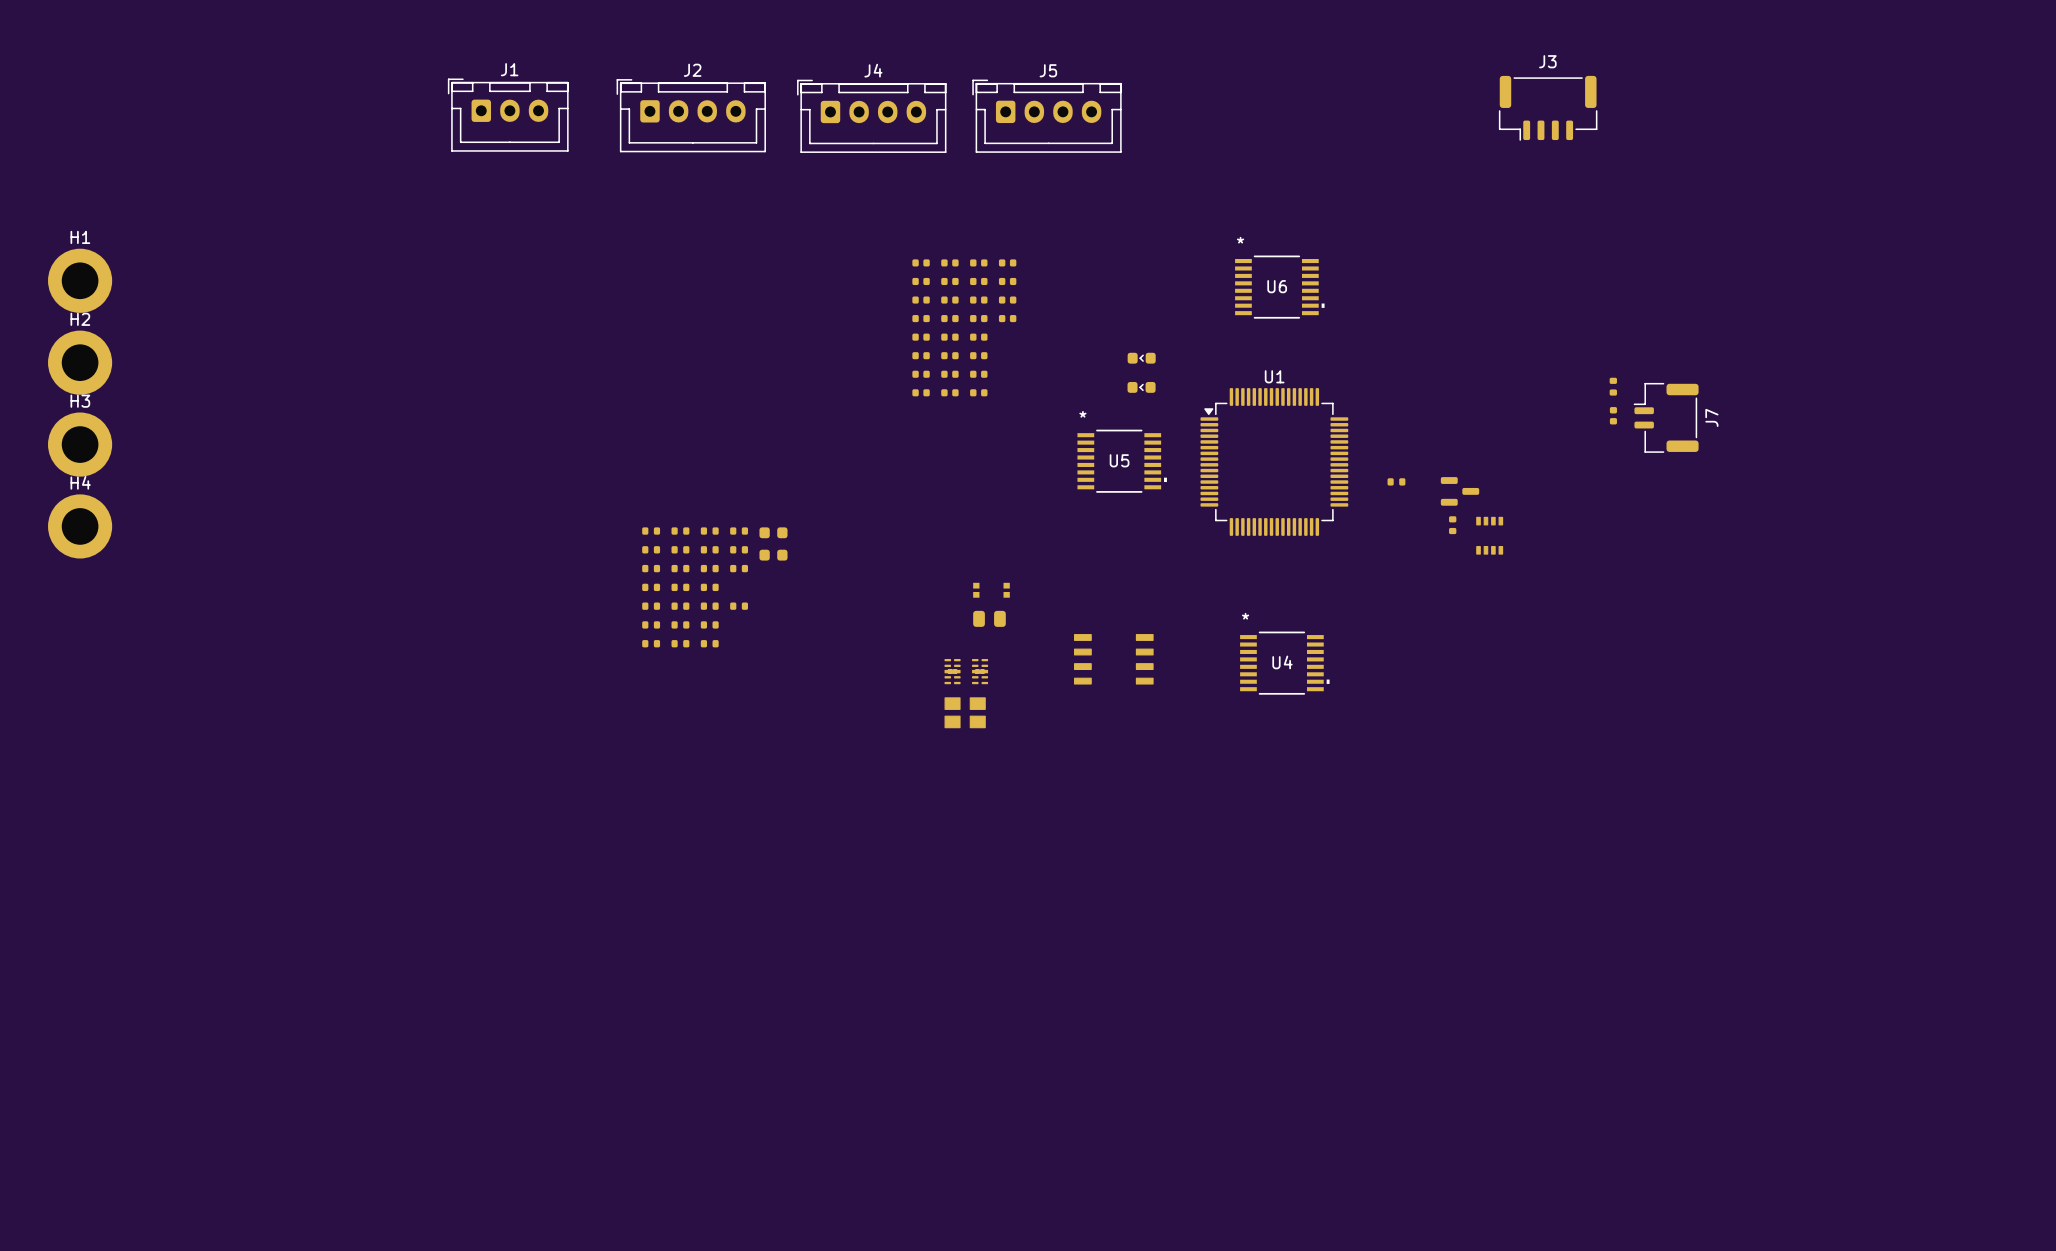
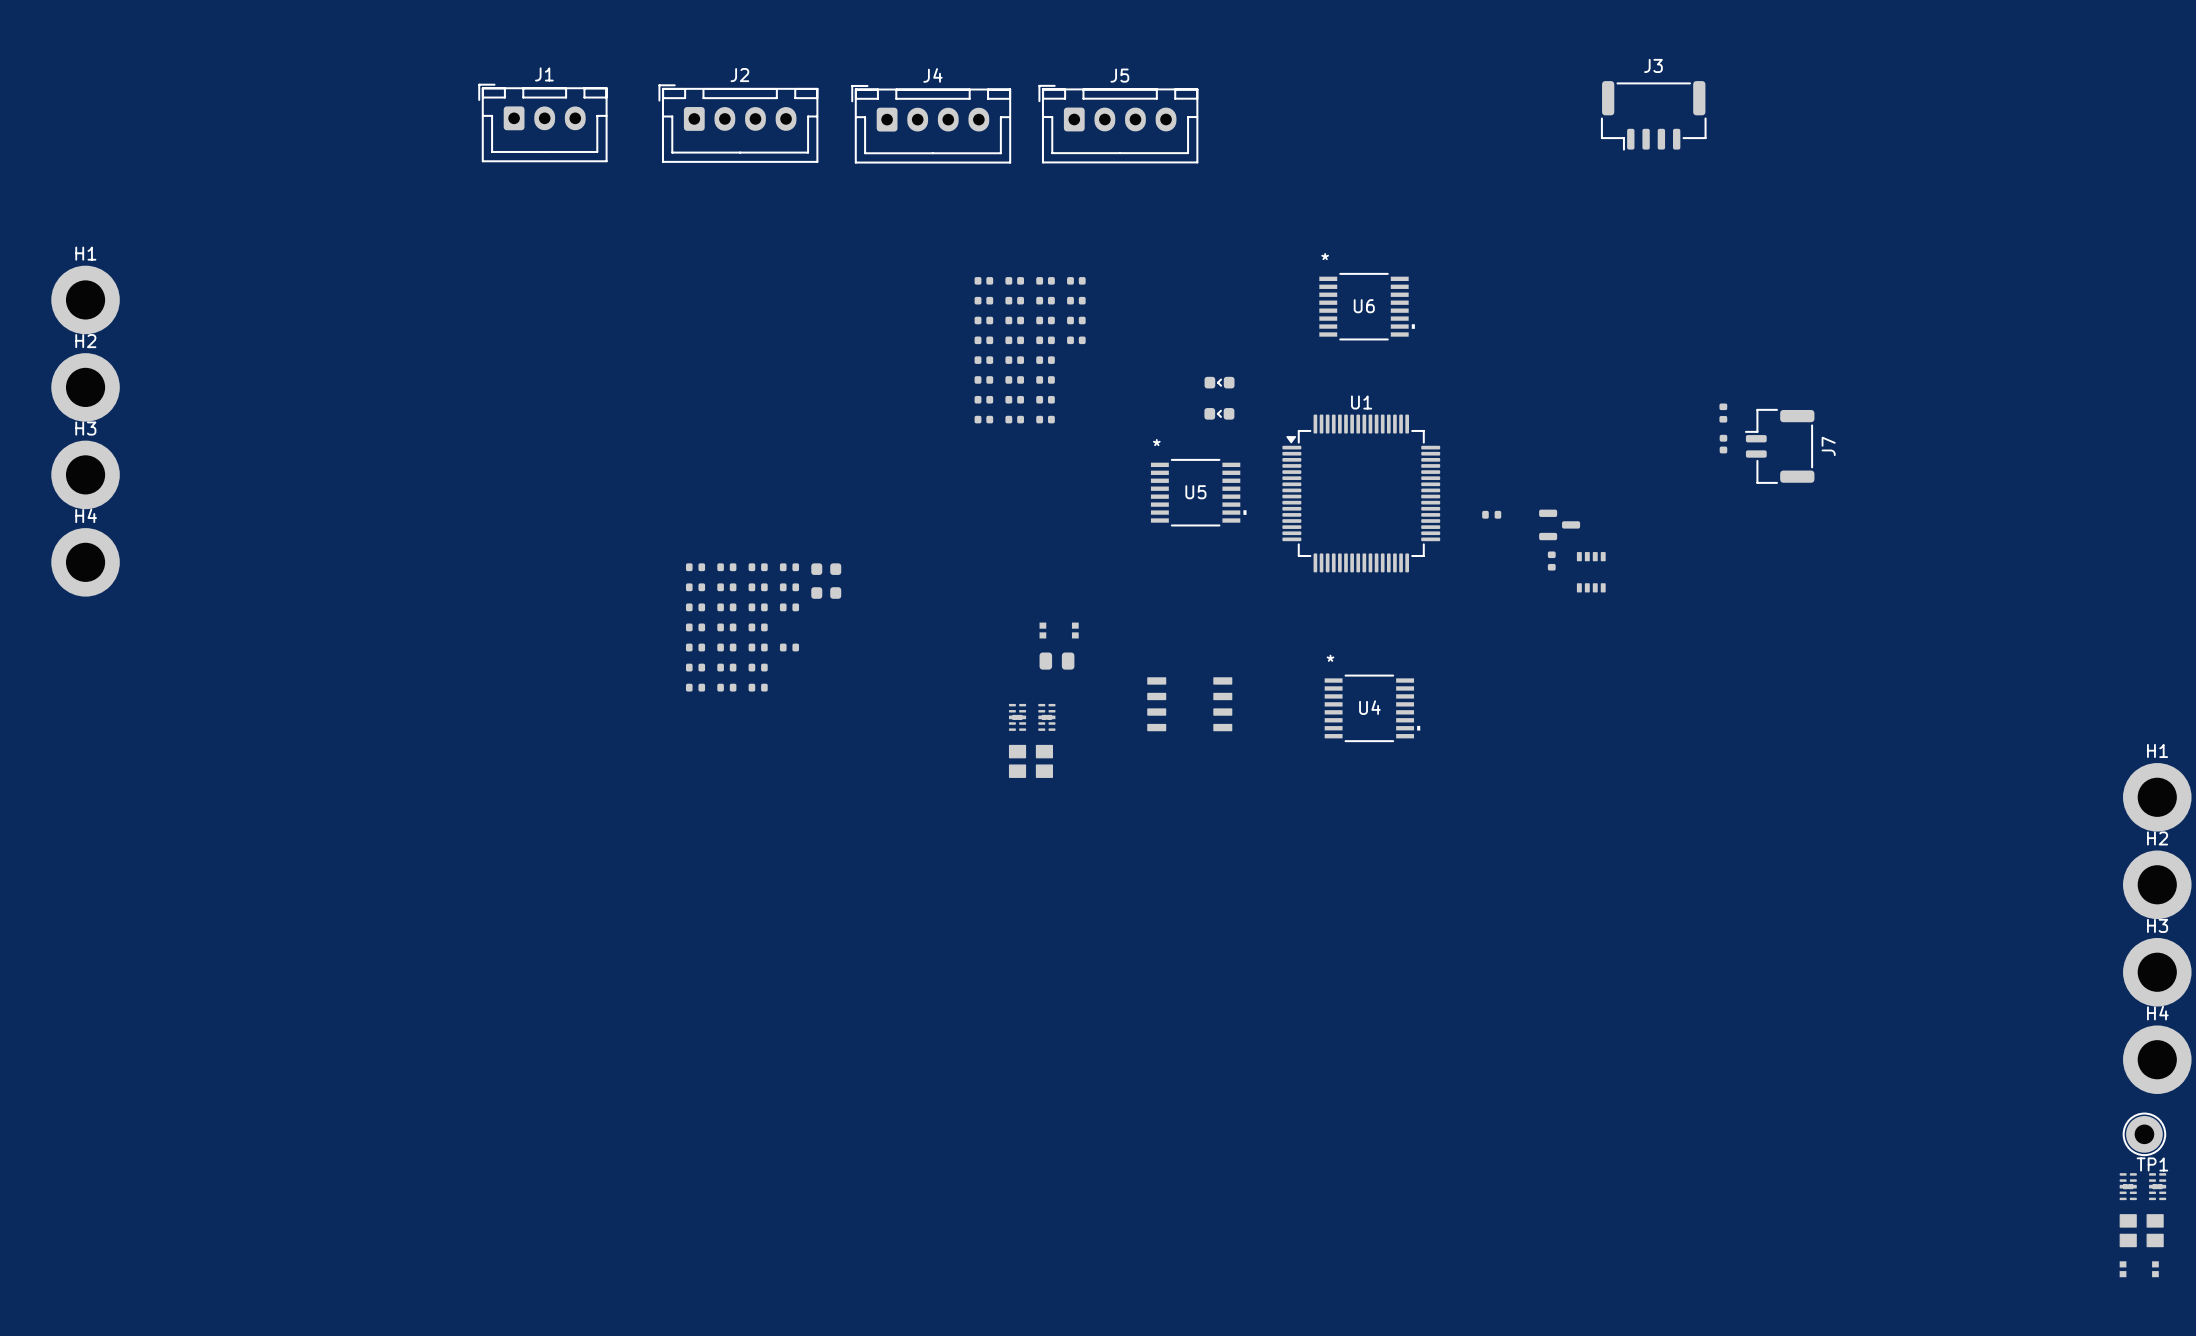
H1: none -> (2157, 797)
H2: none -> (2157, 884)
H3: none -> (2157, 972)
H4: none -> (2157, 1059)
TP1: none -> (2144, 1134)
part: none -> (2128, 1186)
part: none -> (2157, 1186)
part: none -> (2141, 1230)
part: none -> (2139, 1269)

